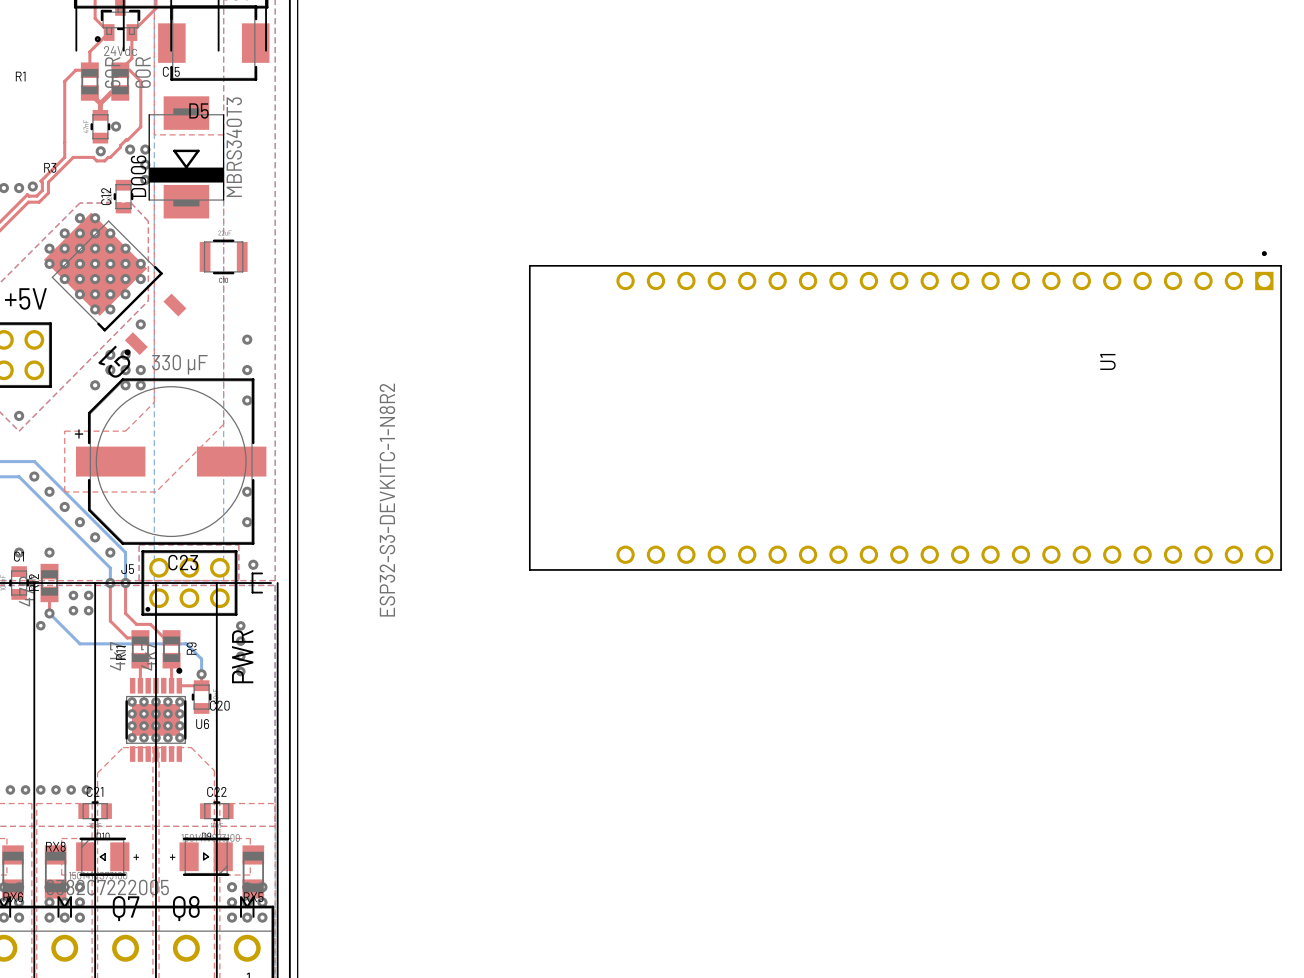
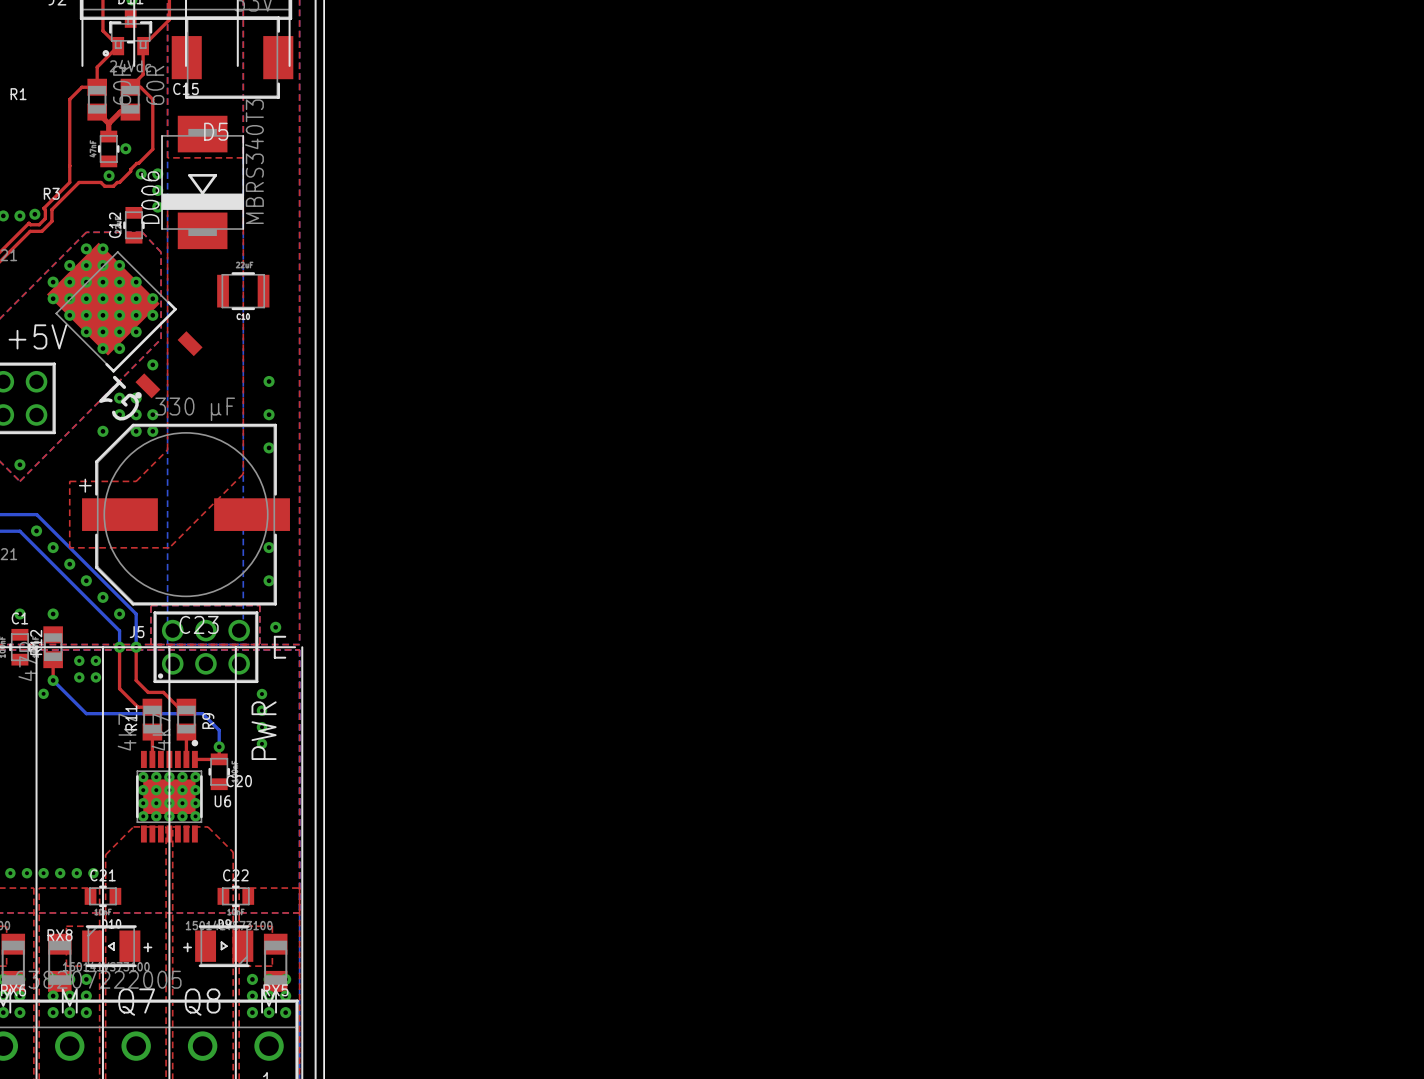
U1: ESP32-S3-DEVKITC-1-N8R2 (905, 410) -> none

